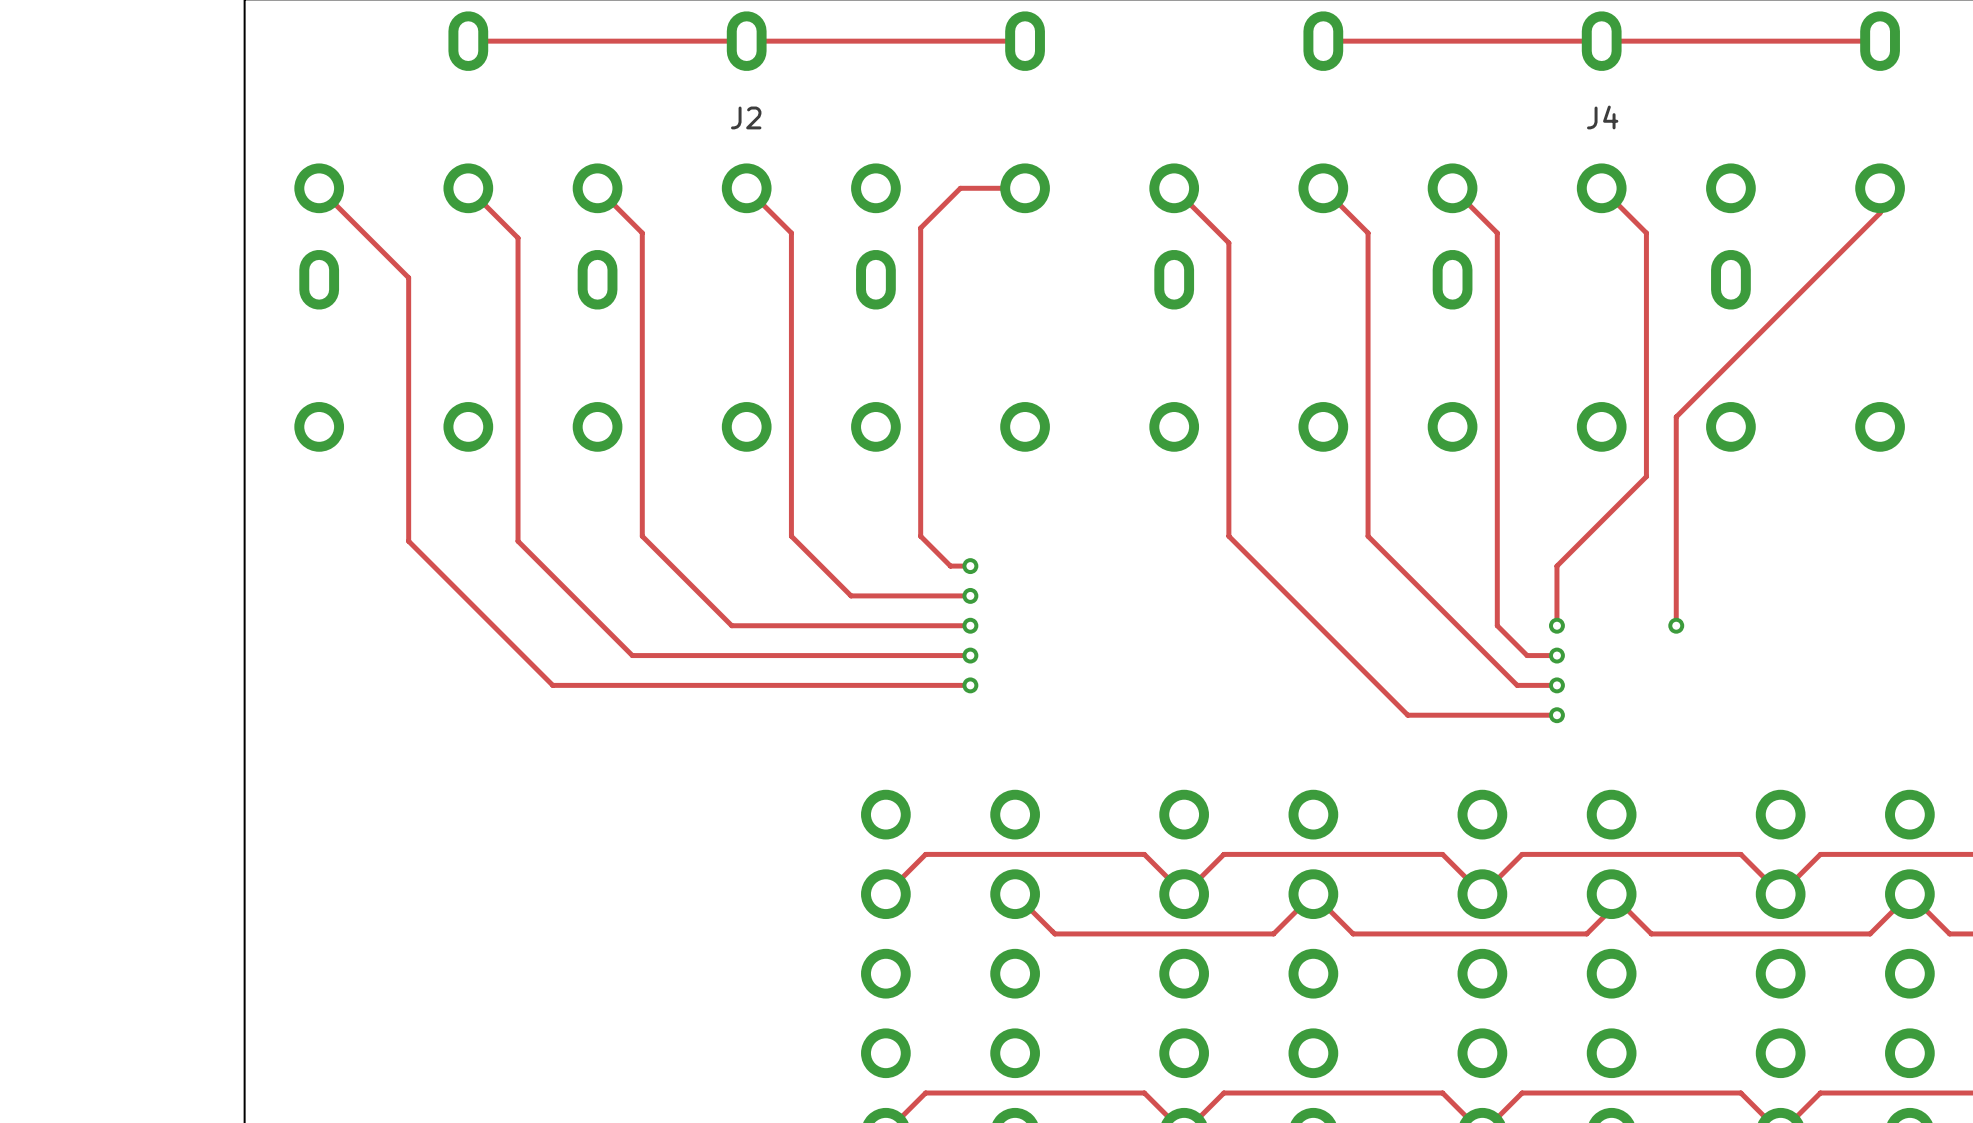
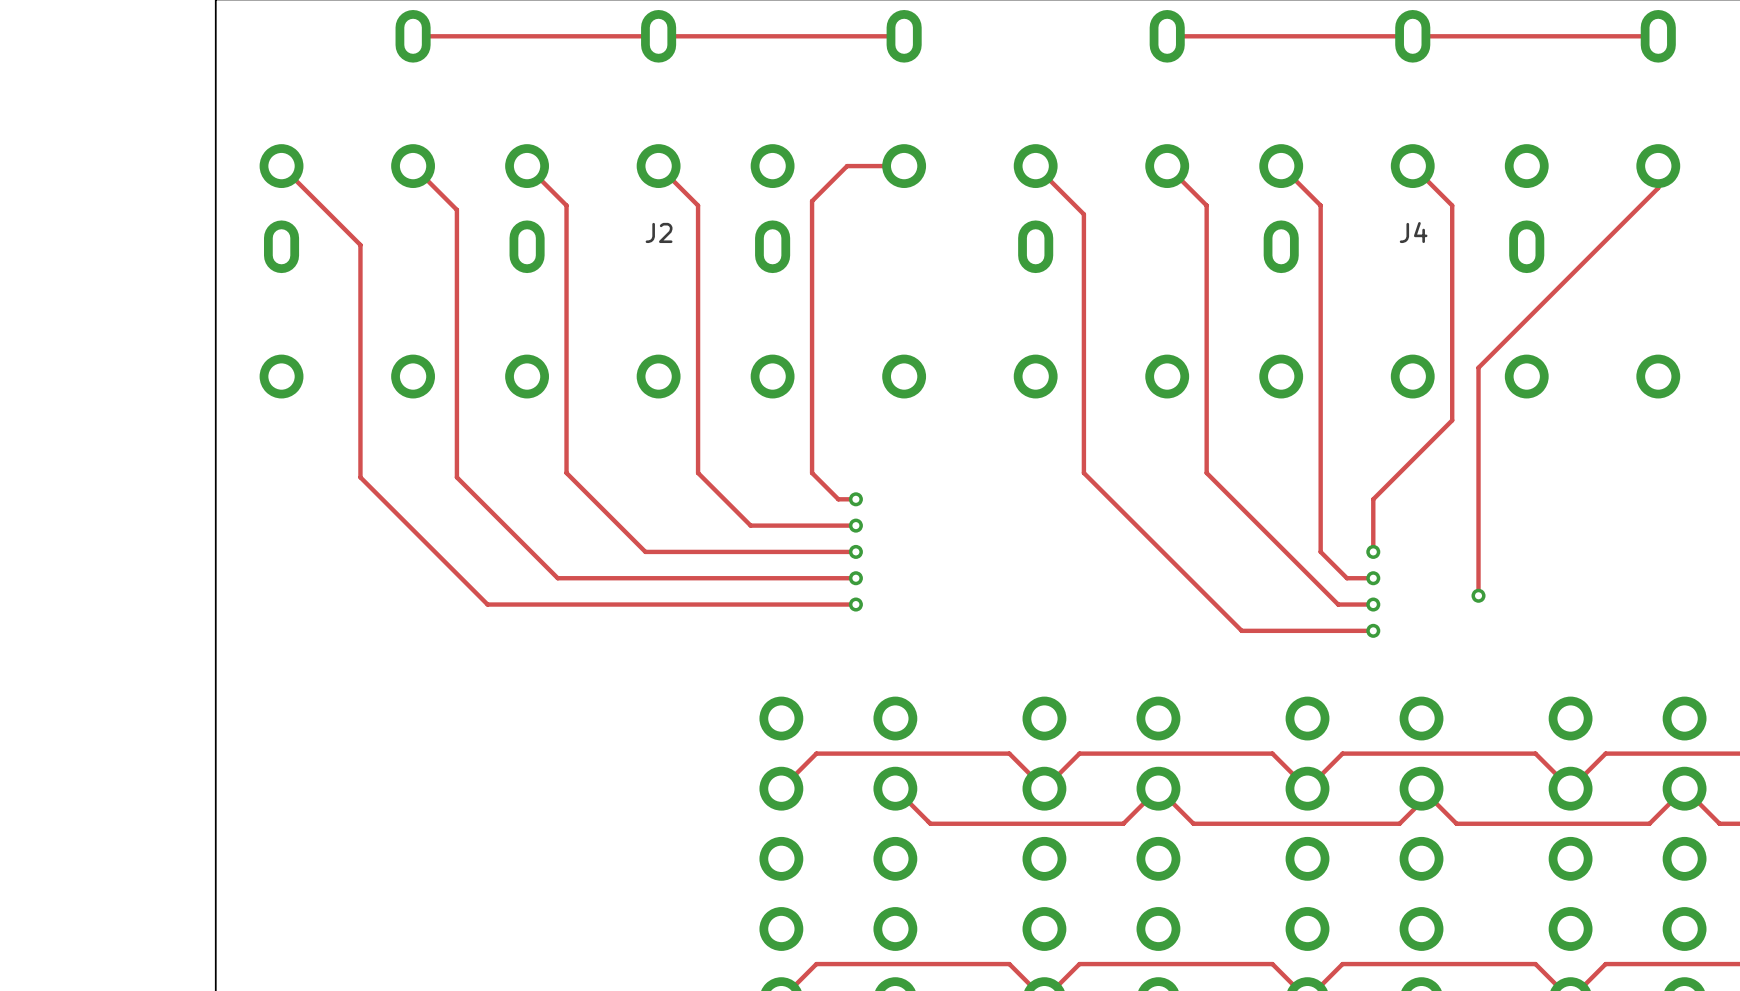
J2 name position: J2 (746, 117) -> J2 (659, 232)
J4 name position: J4 (1602, 117) -> J4 (1413, 232)
track: none -> (1478, 551) (1478, 595)
via position: (1676, 625) -> (1478, 595)

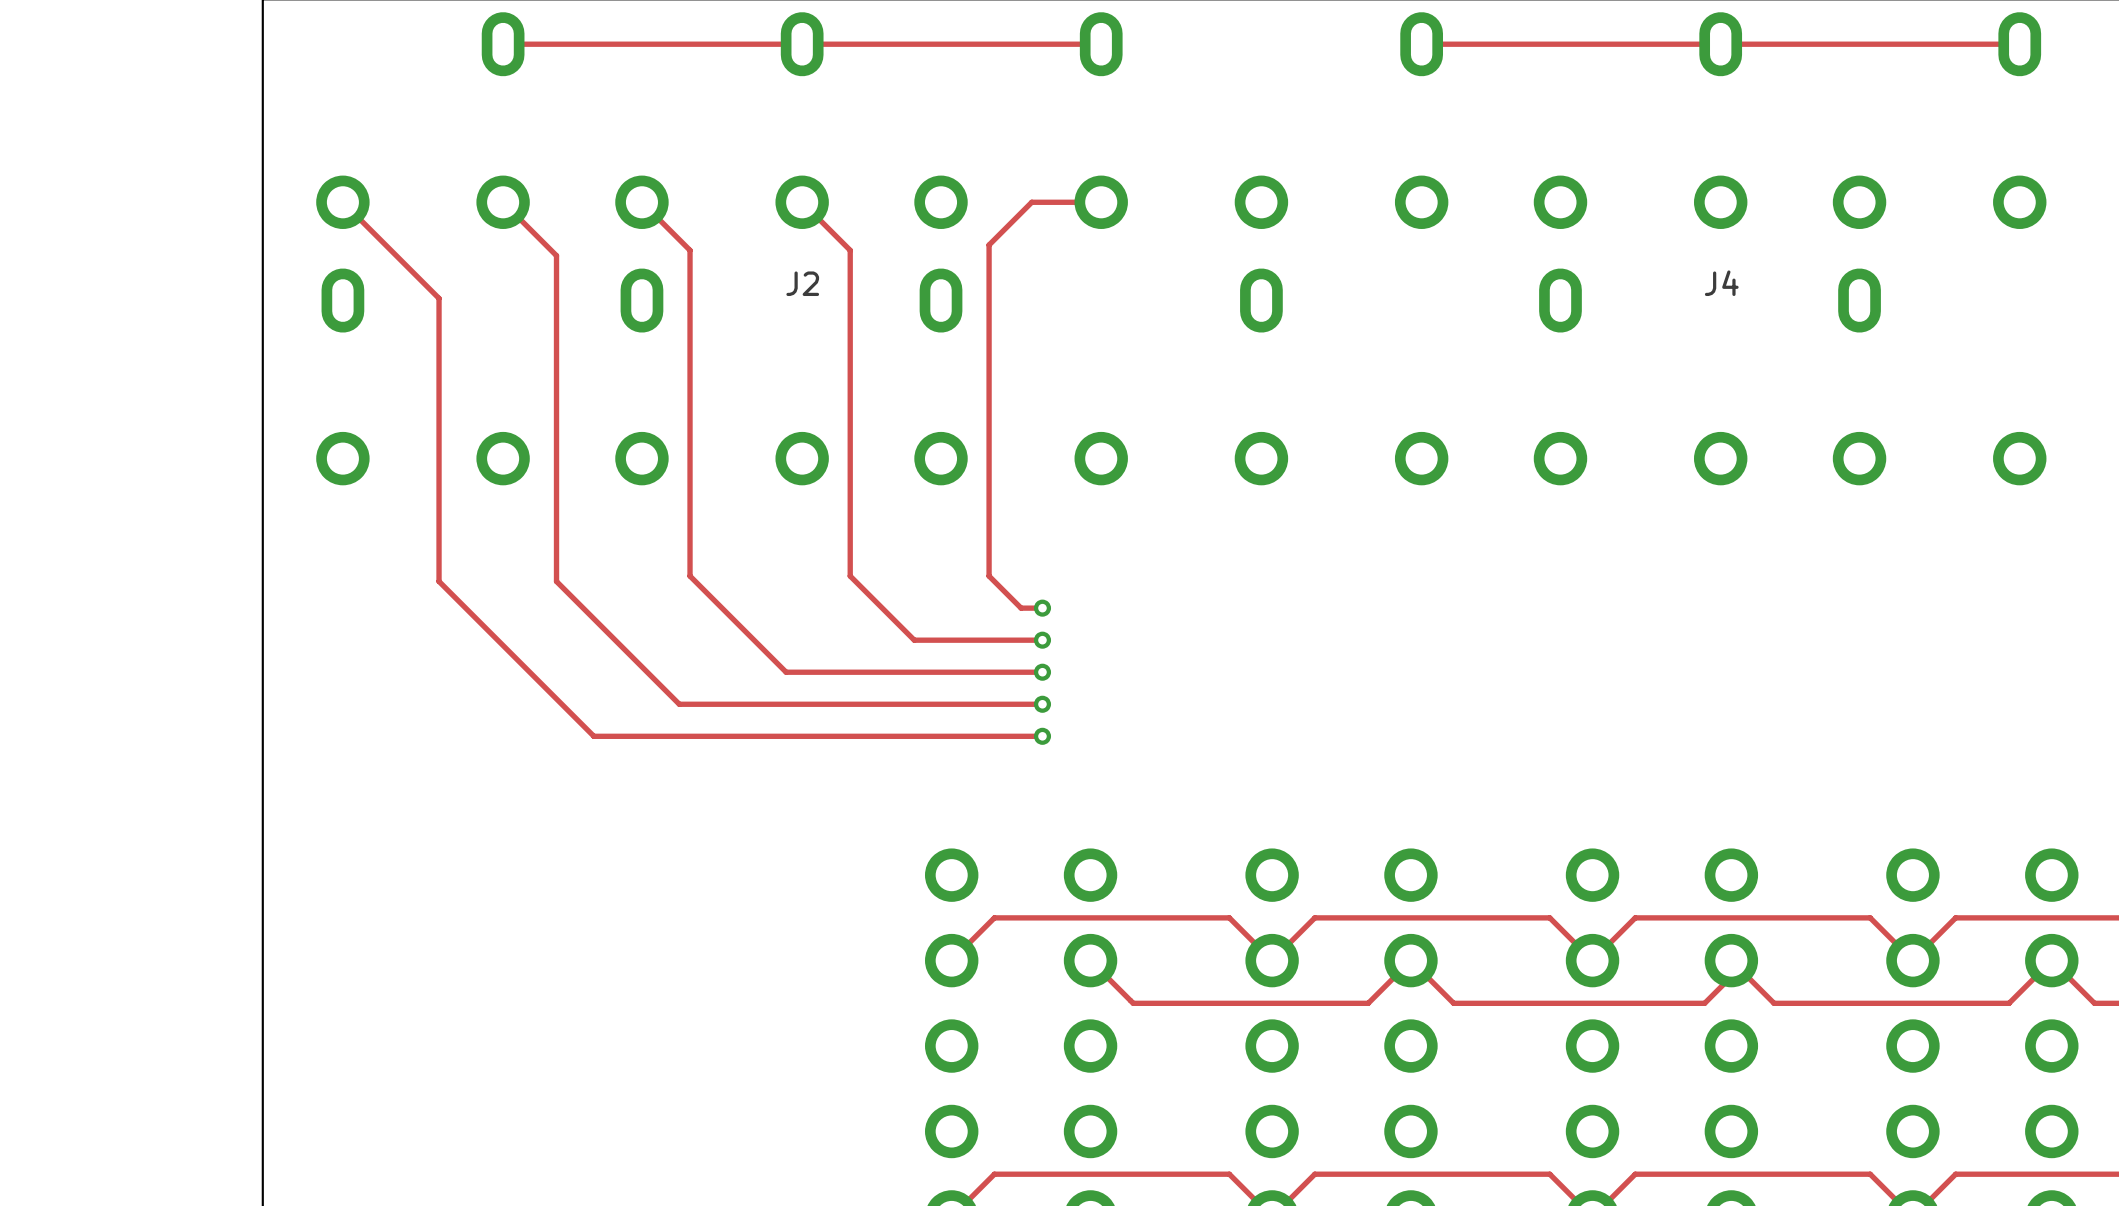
track: (1035, 166) (1083, 214) (1083, 473) (1241, 630) (1373, 630) -> none
track: (1167, 166) (1206, 205) (1206, 473) (1338, 604) (1373, 604) -> none
track: (1281, 166) (1320, 205) (1320, 551) (1346, 578) (1373, 578) -> none
track: (1412, 166) (1452, 205) (1452, 420) (1373, 499) (1373, 551) -> none
track: (1658, 166) (1658, 188) (1478, 367) (1478, 595) -> none
via: (1373, 551) -> none
via: (1373, 578) -> none
via: (1478, 595) -> none
via: (1373, 604) -> none
via: (1373, 630) -> none

